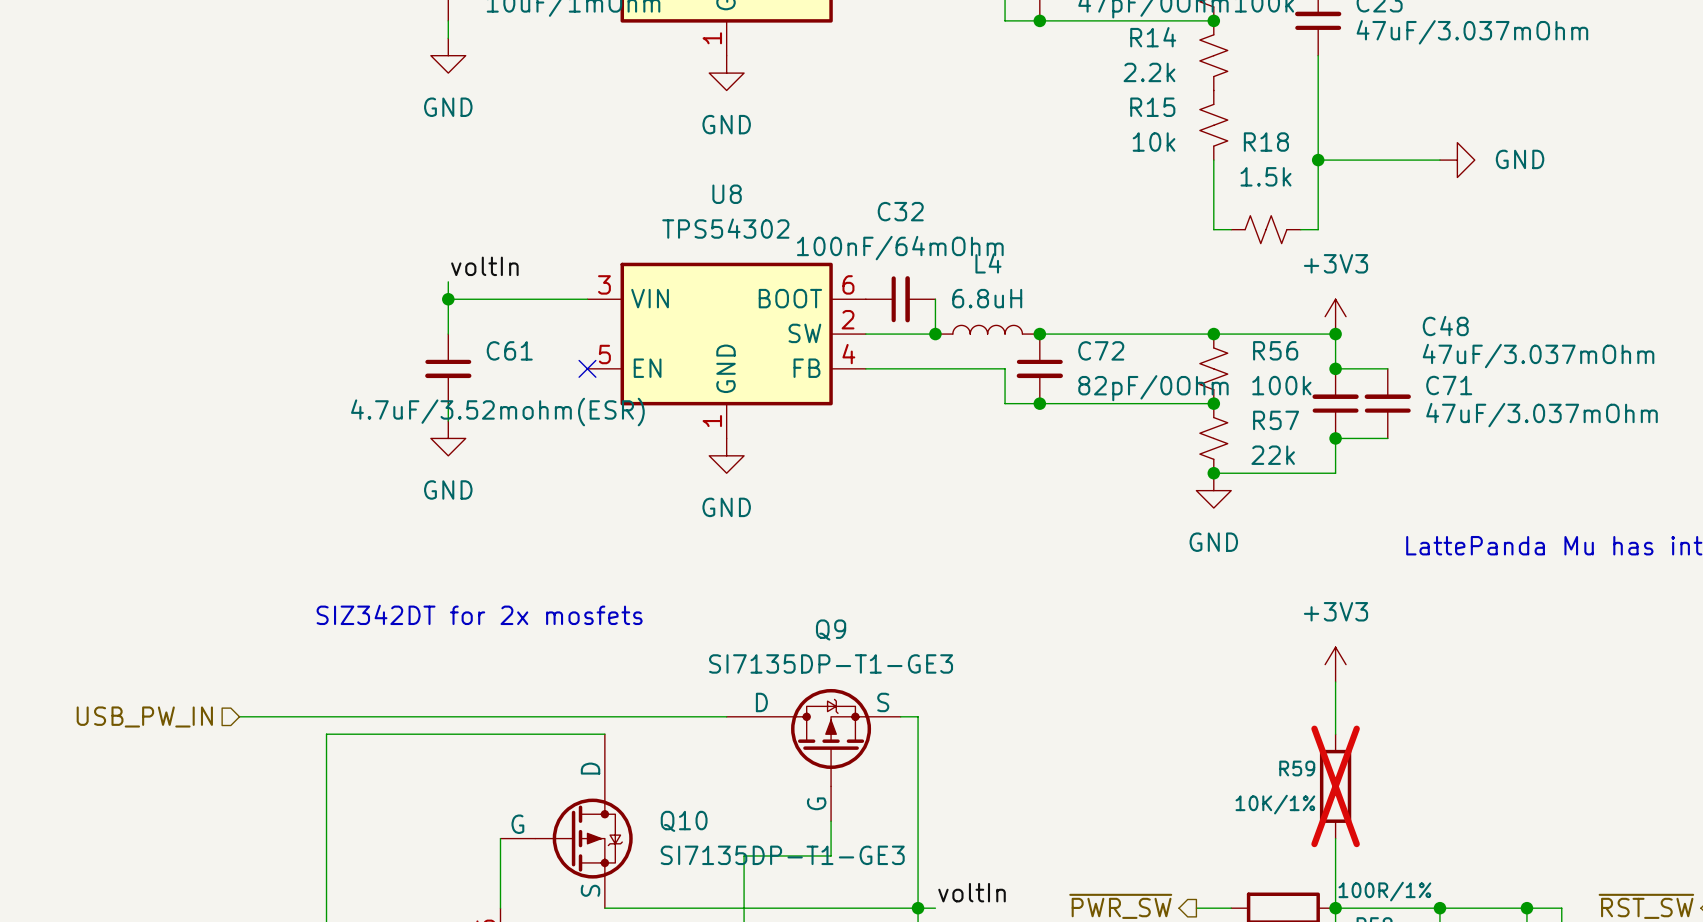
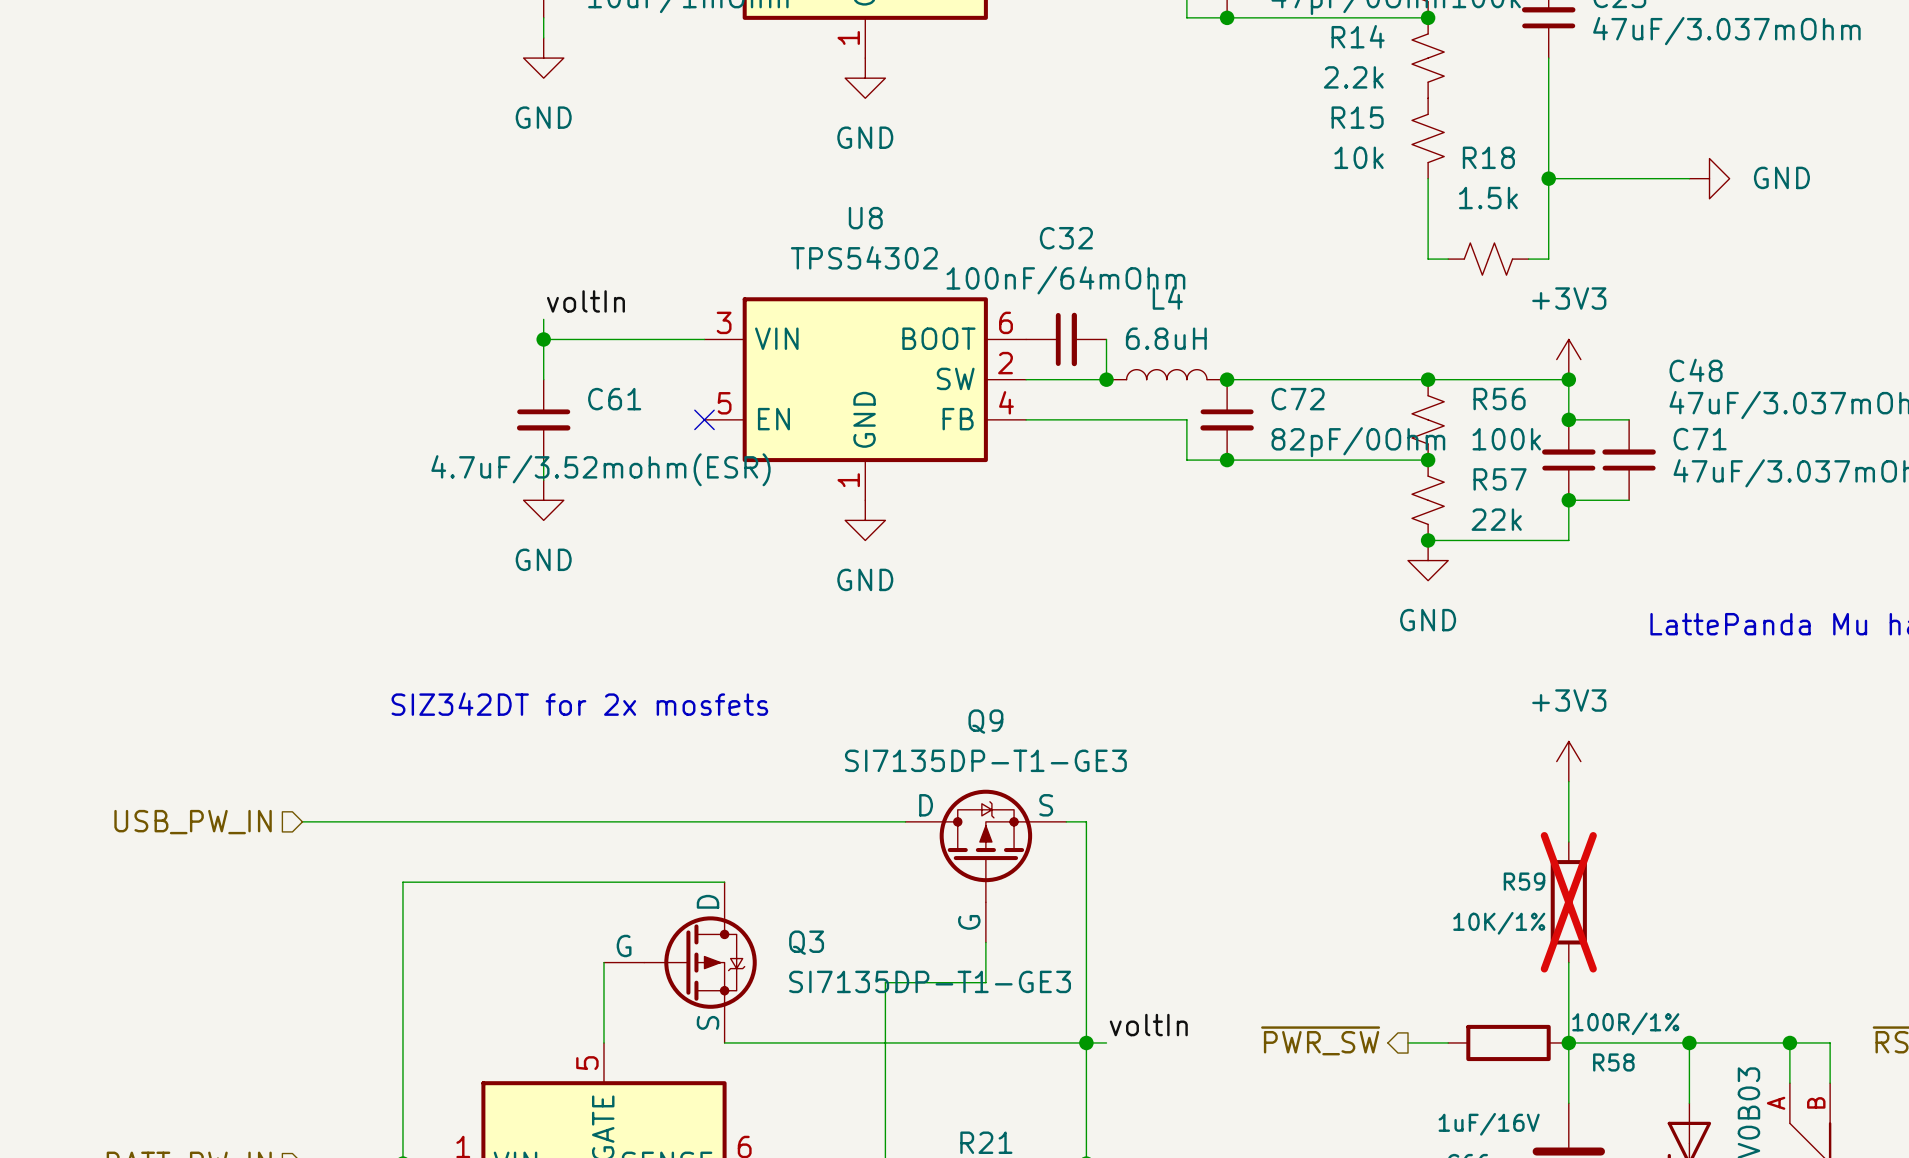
Q9 symbol: [726, 688, 901, 822] -> [905, 789, 1067, 943]
wire: (604, 734) (326, 734) (326, 769) -> (724, 882) (402, 882)
Q10: SI7135DP-T1-GE3 (566, 821) -> none
Q3: none -> SI7135DP-T1-GE3 (680, 962)

